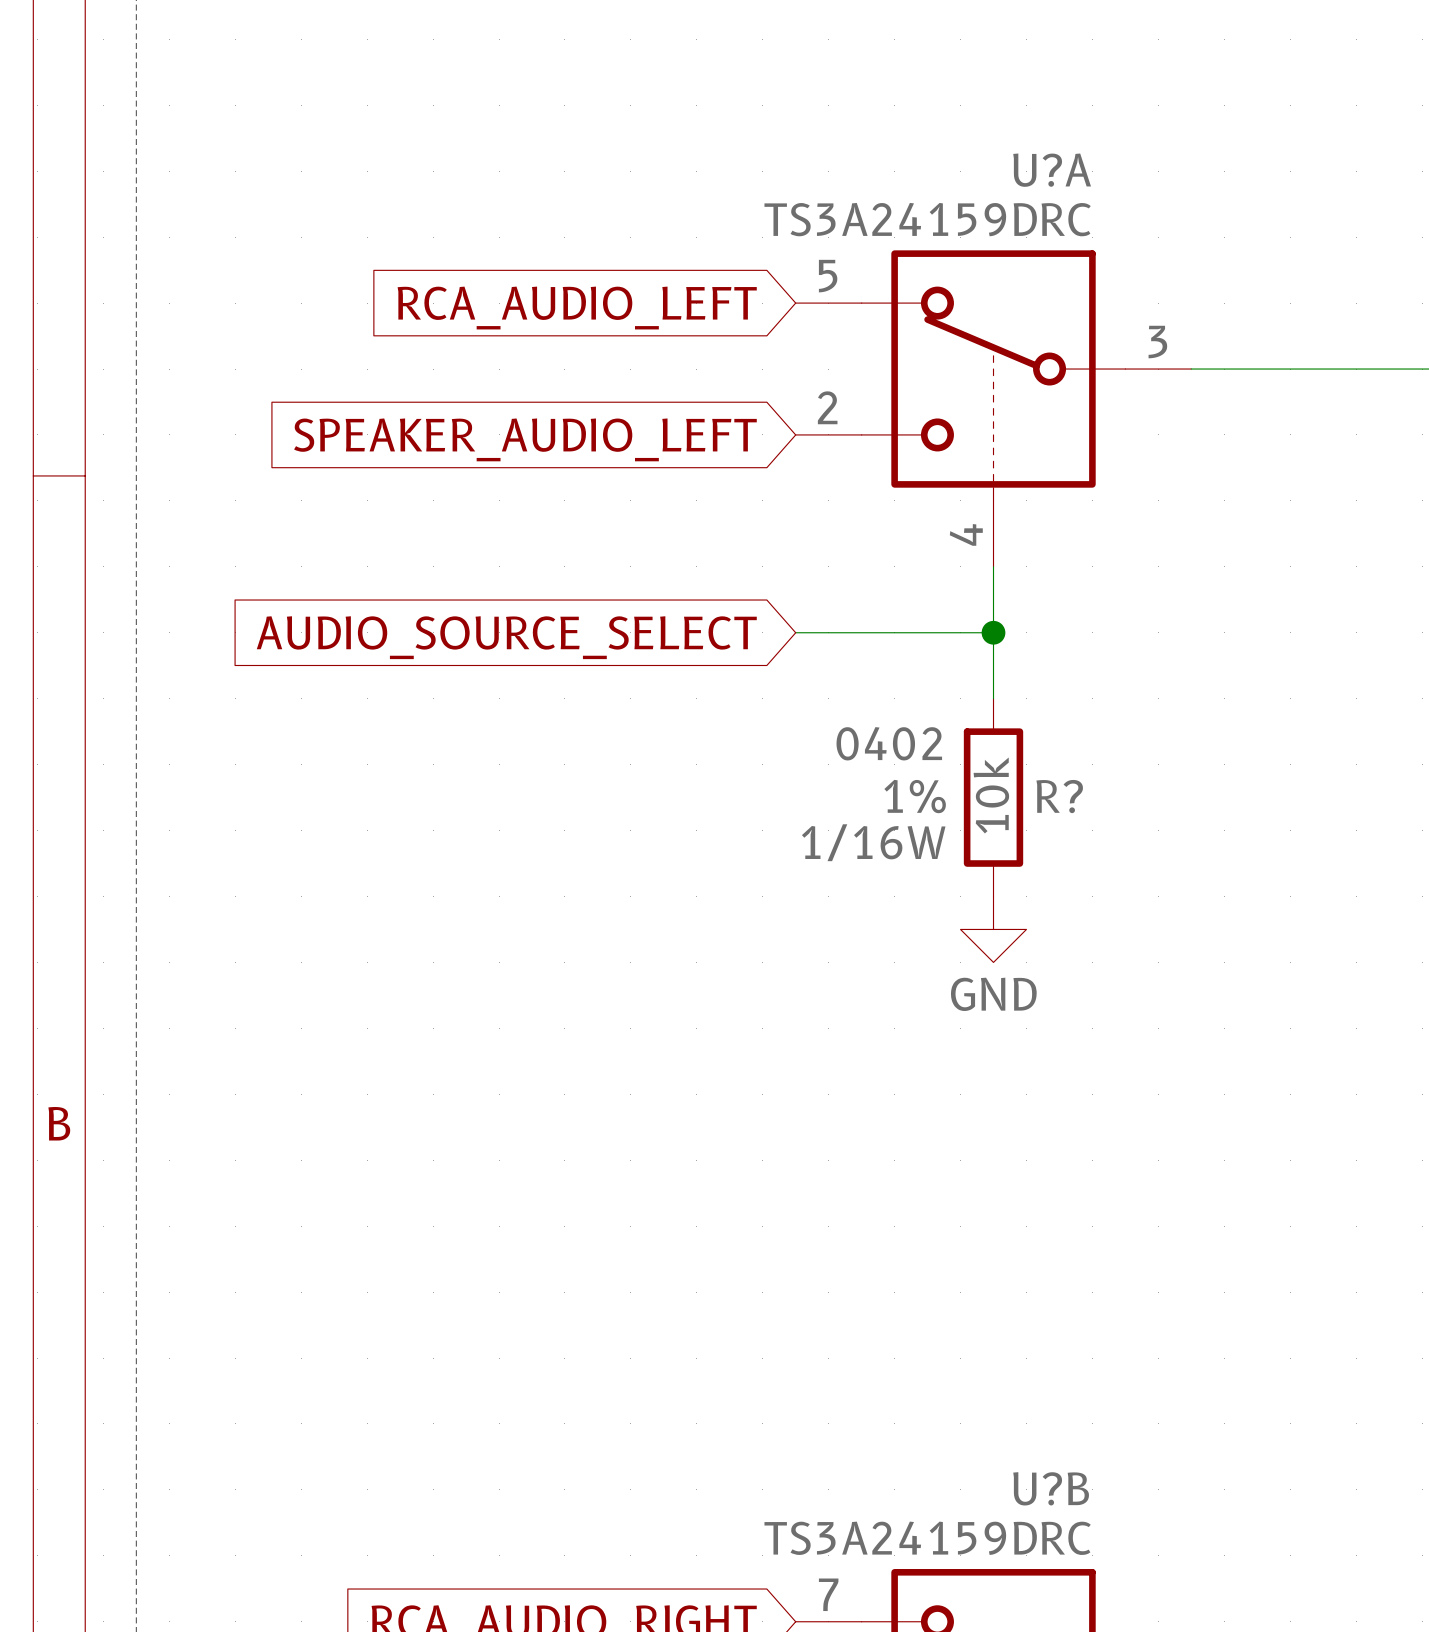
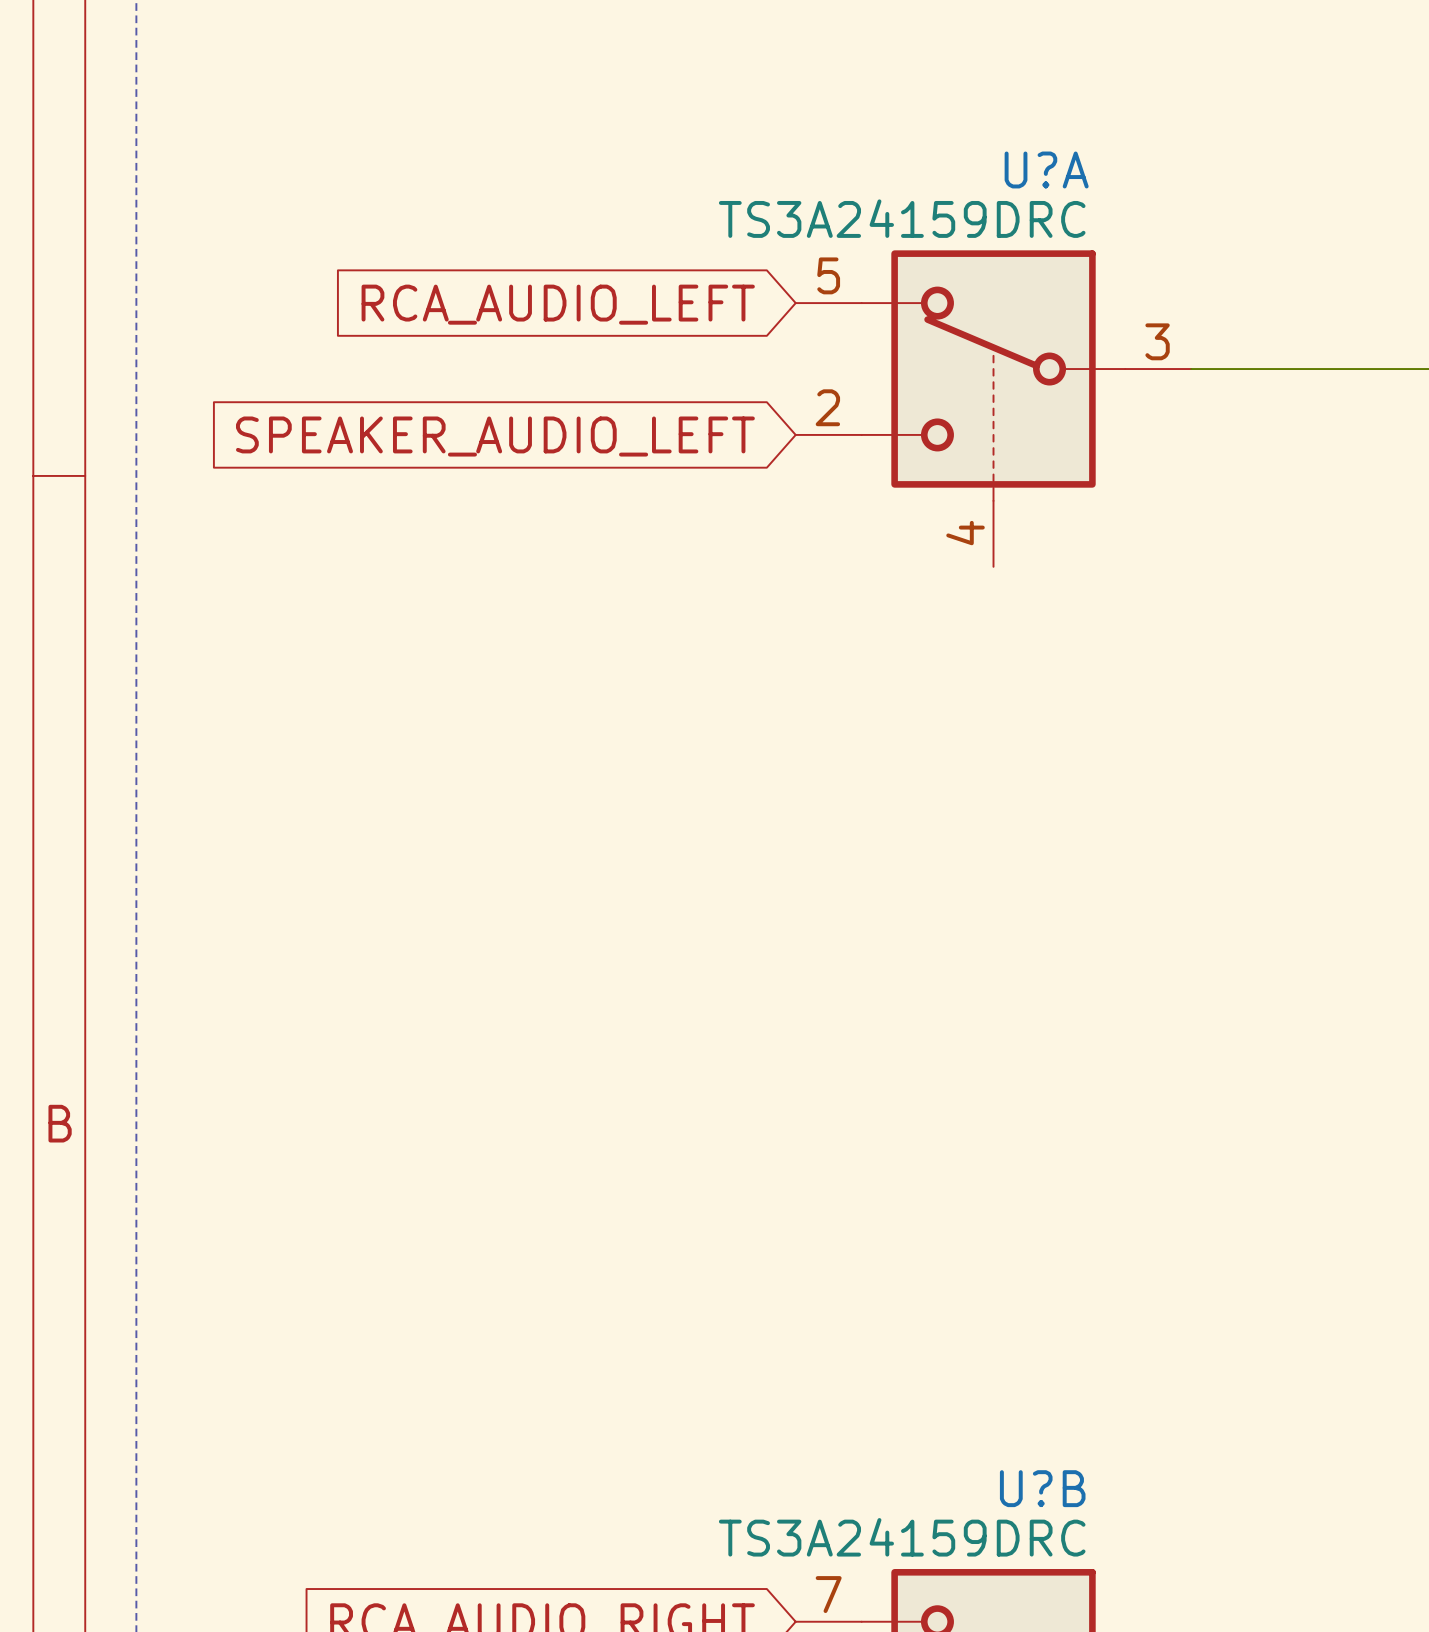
wire: (993, 566) (993, 698) -> none
wire: (795, 632) (993, 632) -> none
junction: (993, 632) -> none
global label: AUDIO_SOURCE_SELECT (506, 637) -> none
R?: 10k (993, 797) -> none
power symbol: GND (993, 929) -> none

